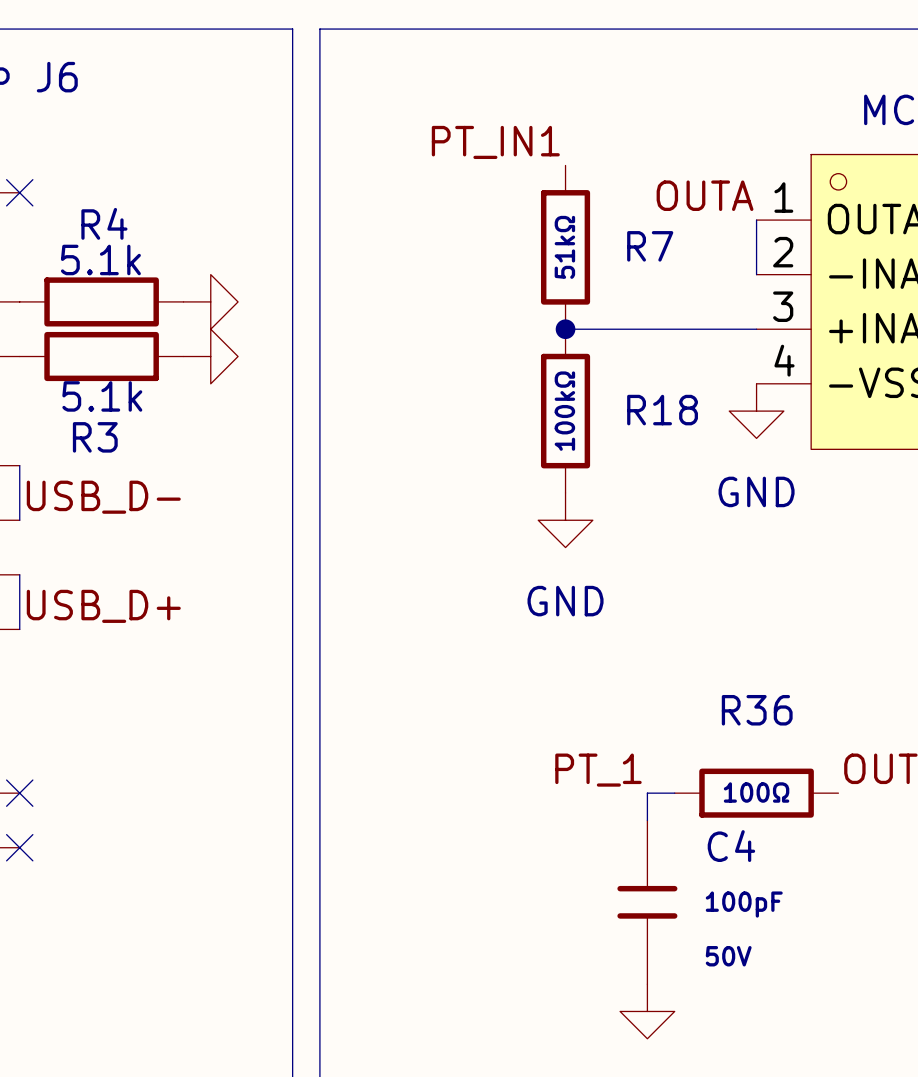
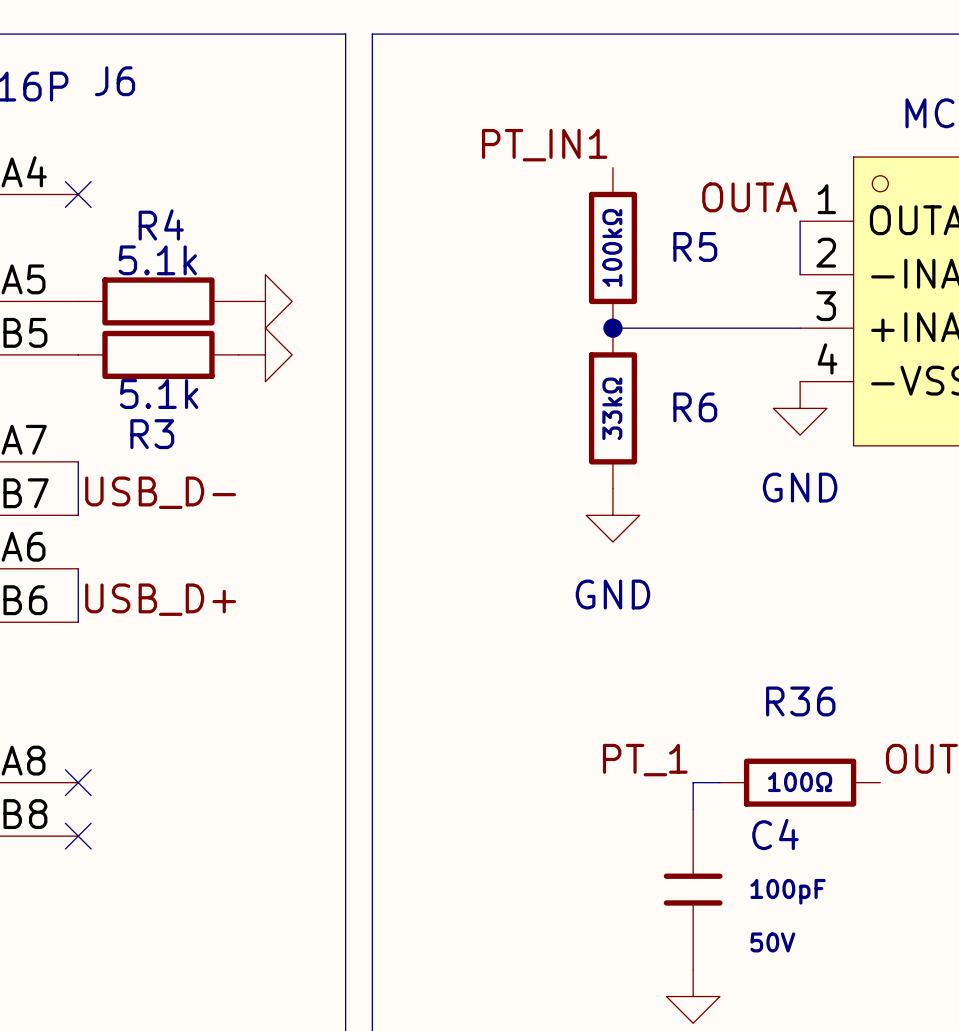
R7 name: R7 (650, 246) -> R5 (695, 246)
R7 value: 51kΩ (564, 247) -> 100kΩ (612, 247)
R18 name: R18 (662, 410) -> R6 (695, 407)
R18 value: 100kΩ (564, 411) -> 33kΩ (612, 408)

